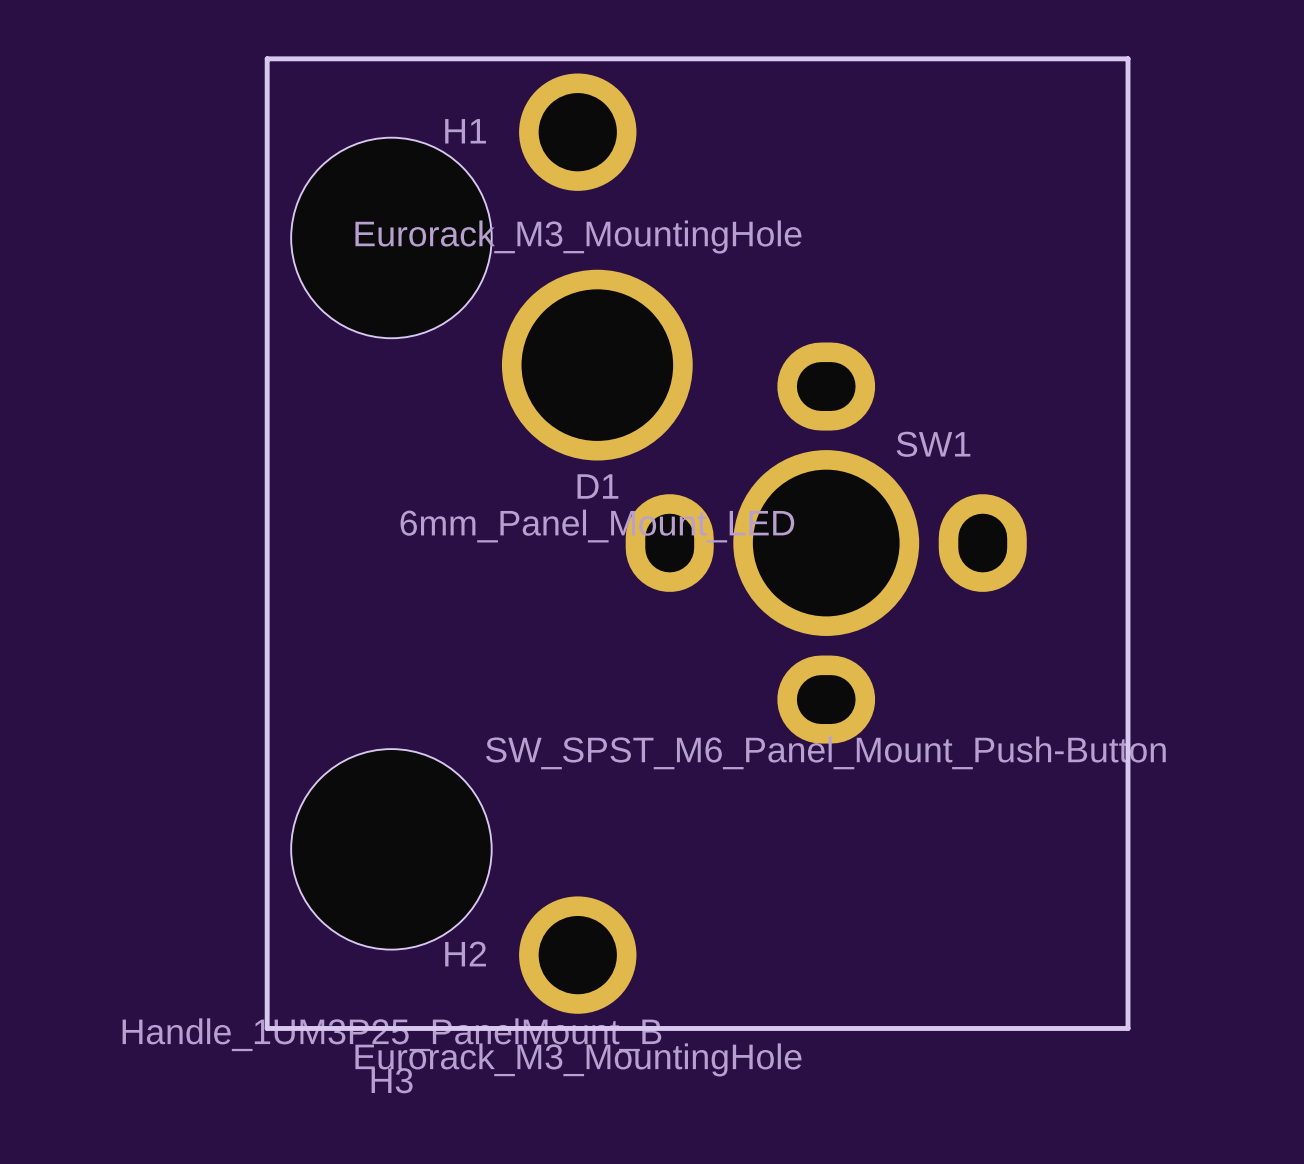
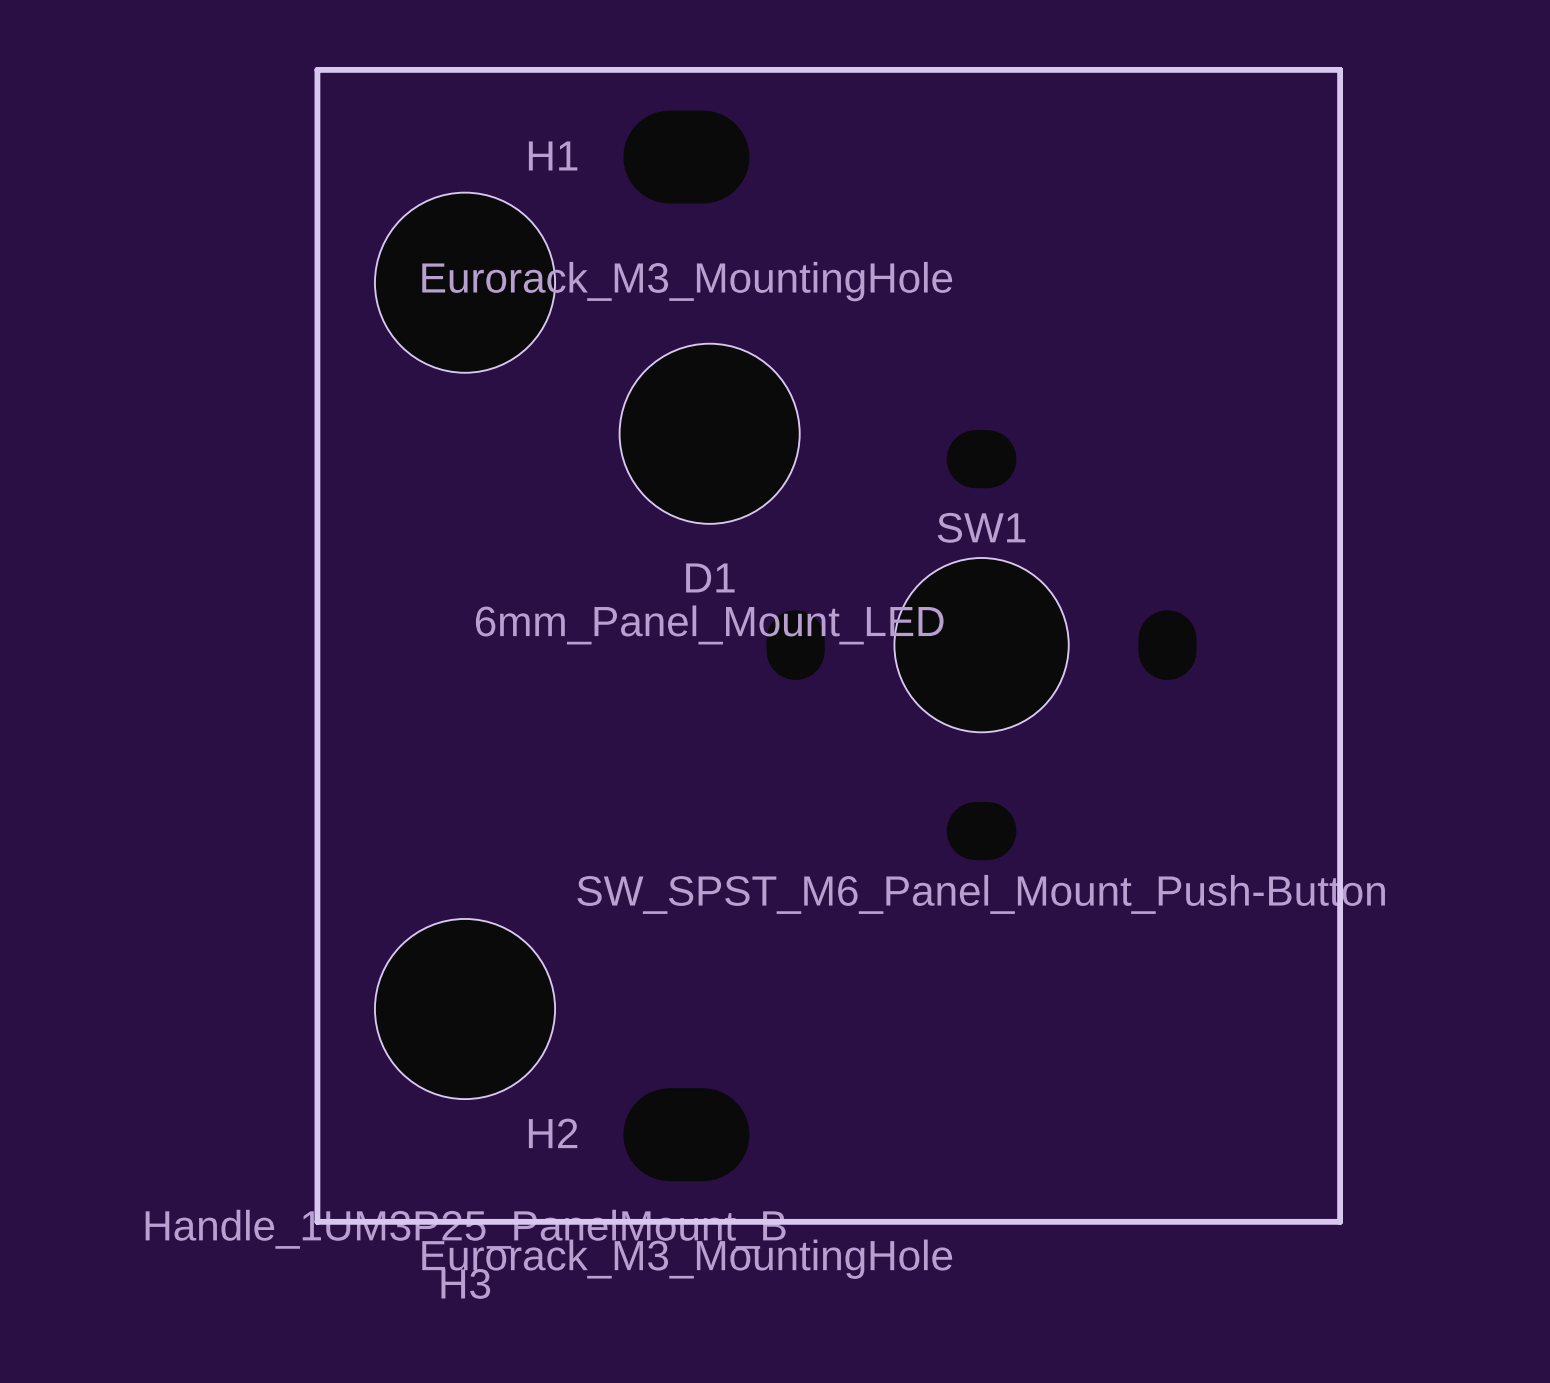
H1 footprint: [519, 73, 637, 191] -> [623, 110, 750, 204]
H3 footprint: [291, 137, 492, 950] -> [374, 192, 556, 1100]
D1 footprint: [501, 269, 693, 461] -> [619, 343, 800, 524]
SW1 footprint: [625, 342, 1027, 744] -> [766, 430, 1197, 861]
SW1 name position: SW1 (933, 444) -> SW1 (981, 527)
H2 footprint: [519, 896, 637, 1014] -> [623, 1088, 750, 1182]

